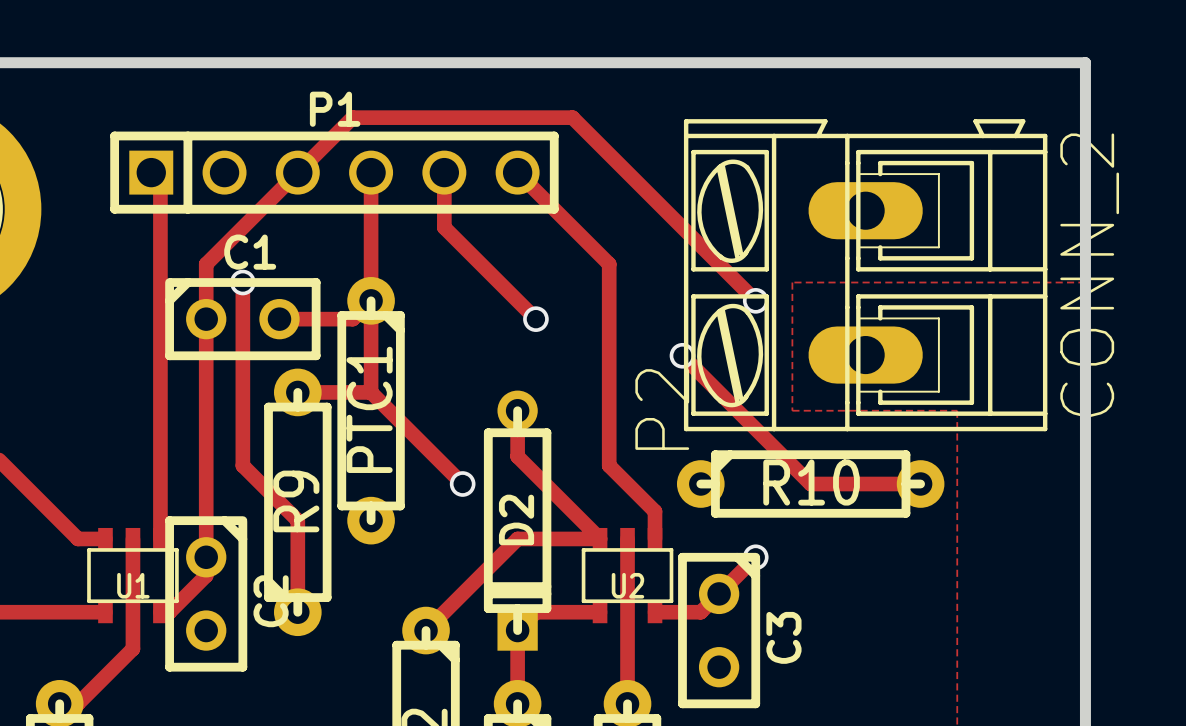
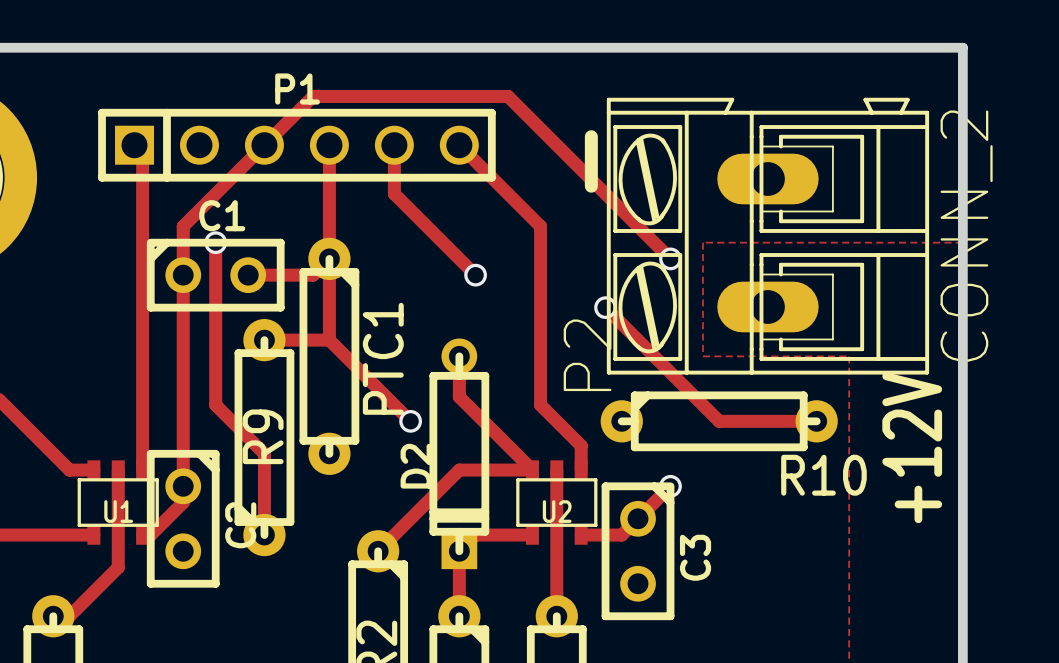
text: none -> - (591, 161)
PTC1 name position: PTC1 (369, 409) -> PTC1 (383, 358)
R10 name position: R10 (811, 482) -> R10 (823, 475)
text: none -> +12V (912, 447)
D2 name position: D2 (516, 519) -> D2 (416, 466)

